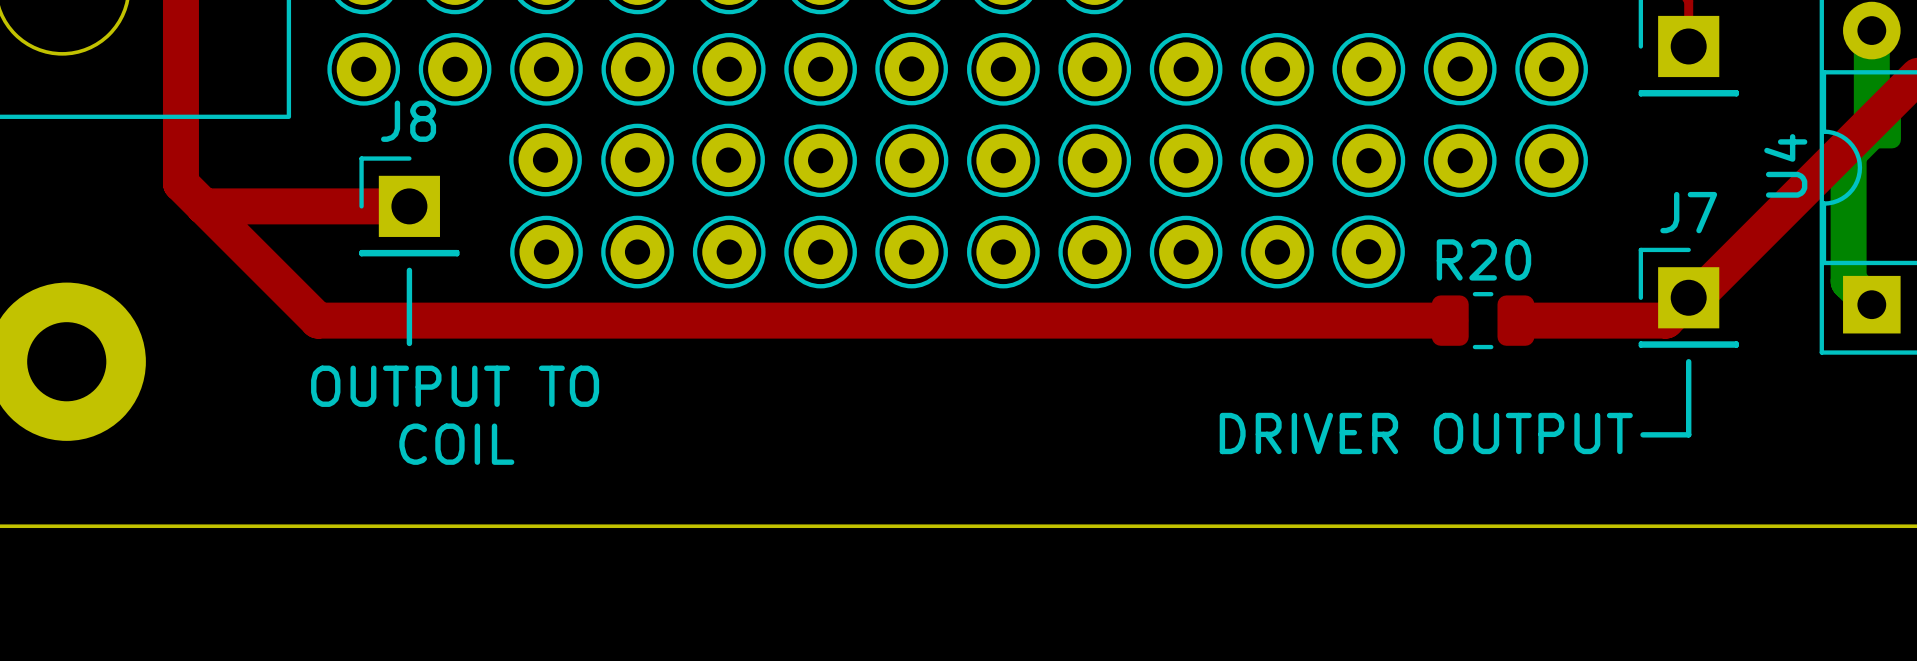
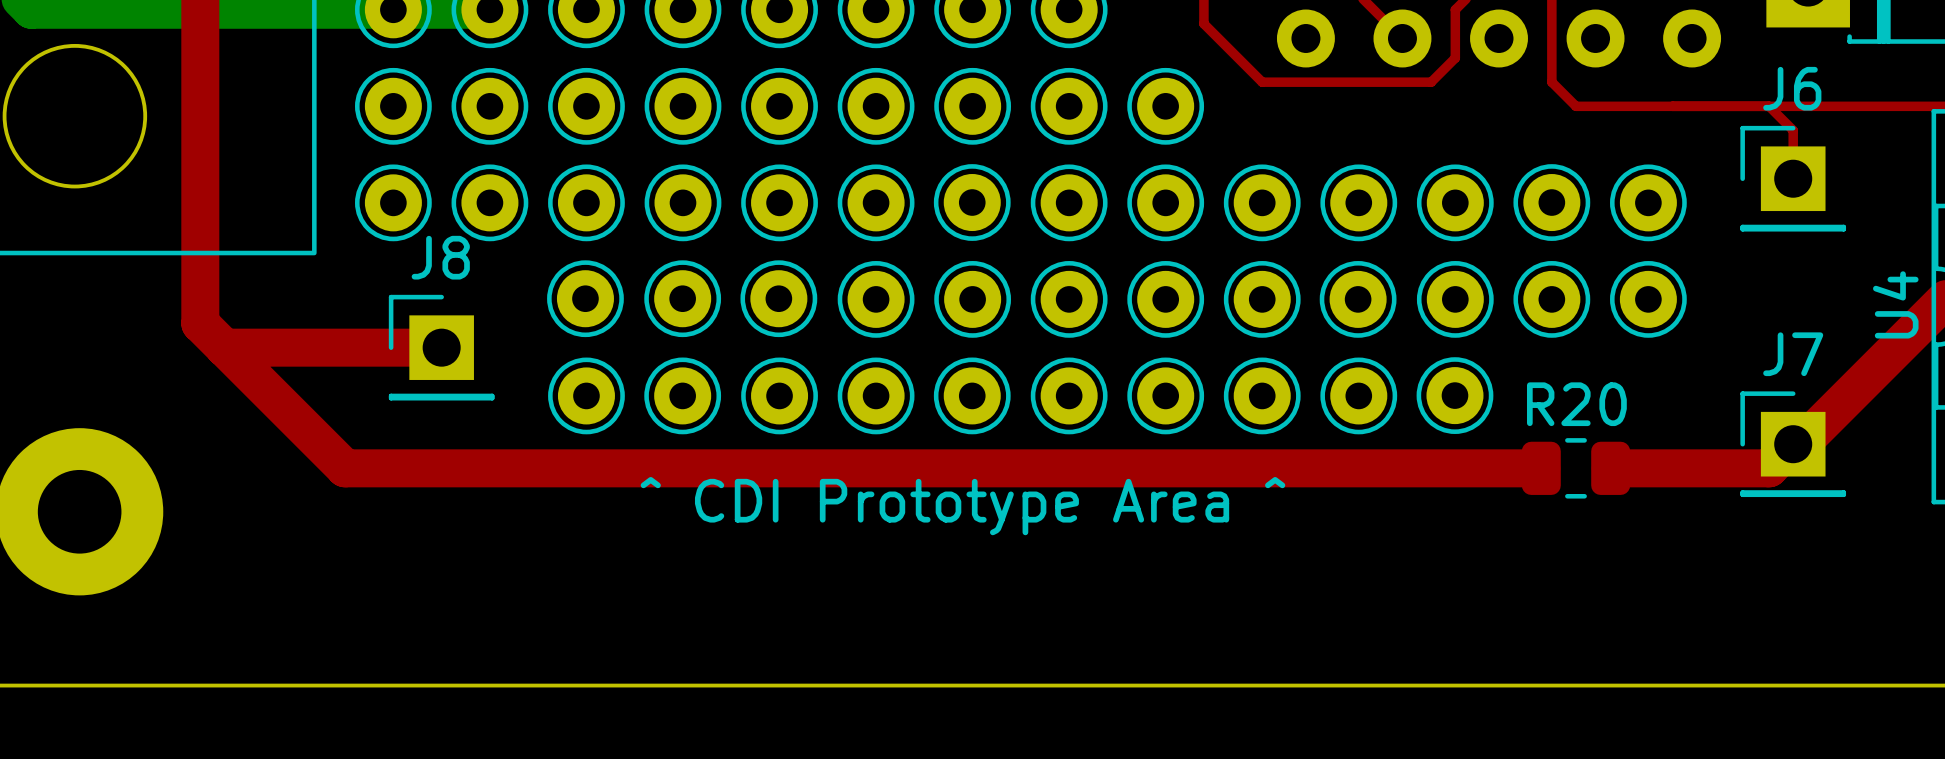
line: (409, 270) (409, 343) -> none
text: none -> ^ CDI Prototype Area ^ (962, 506)
line: (1688, 361) (1688, 434) (1643, 434) -> none
text: OUTPUT TO (455, 386) -> none
text: DRIVER OUTPUT (1426, 433) -> none
text: COIL (456, 444) -> none

